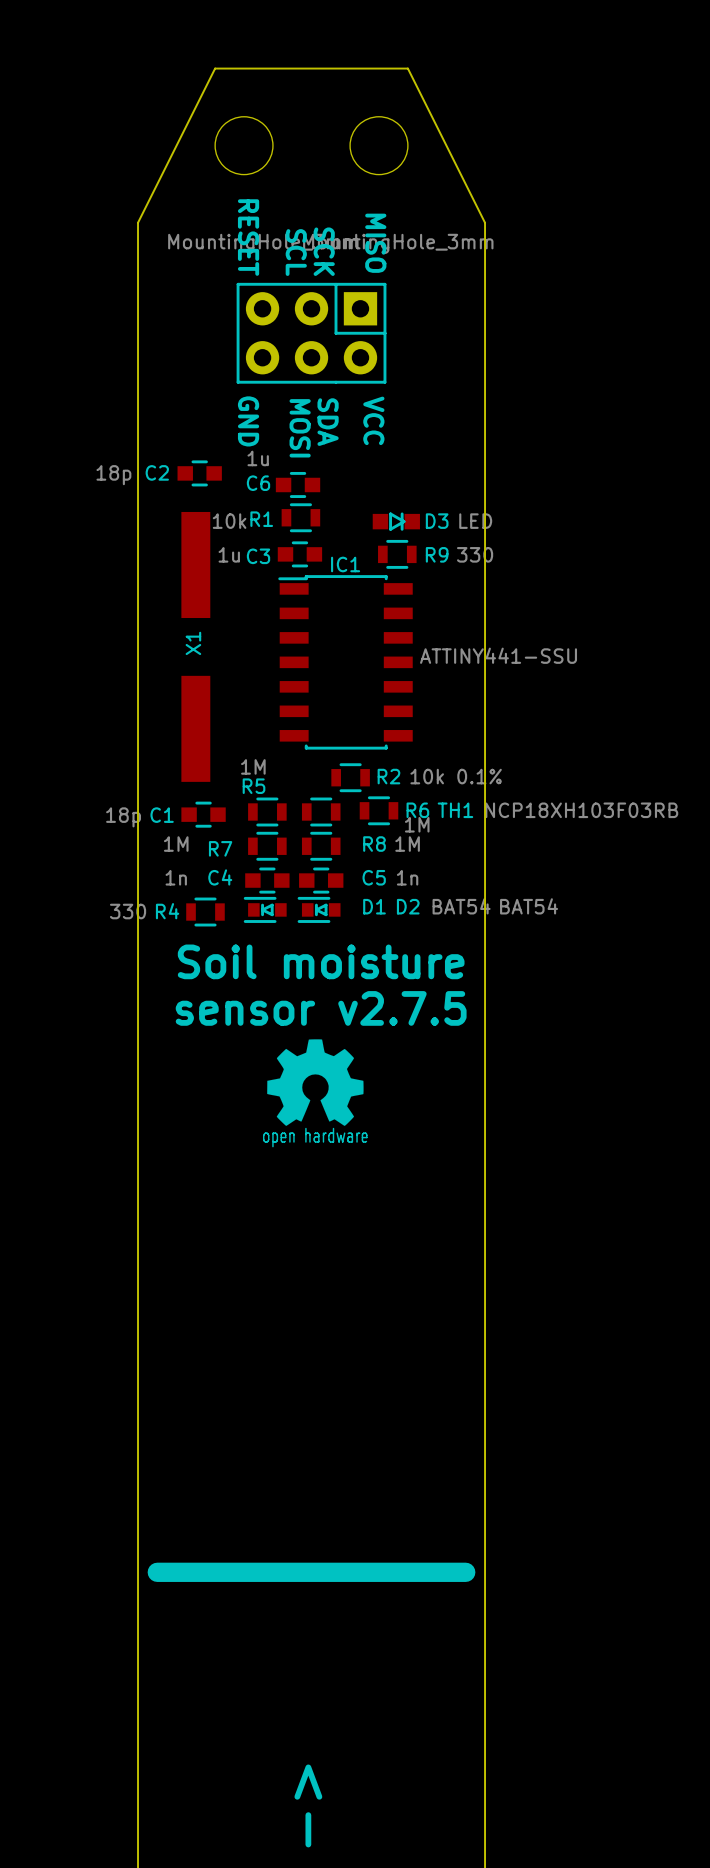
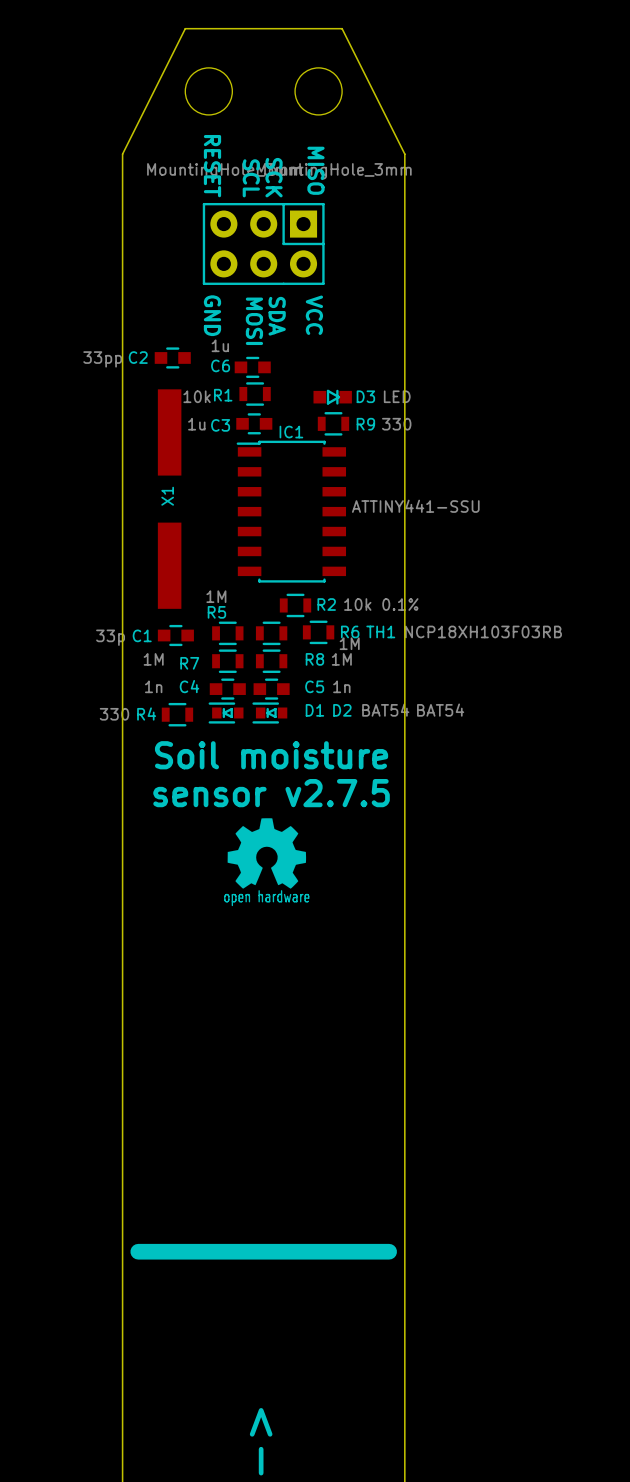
C2 value: 18p (113, 475) -> 33pp (102, 359)
C1 value: 18p (123, 817) -> 33p (110, 637)

